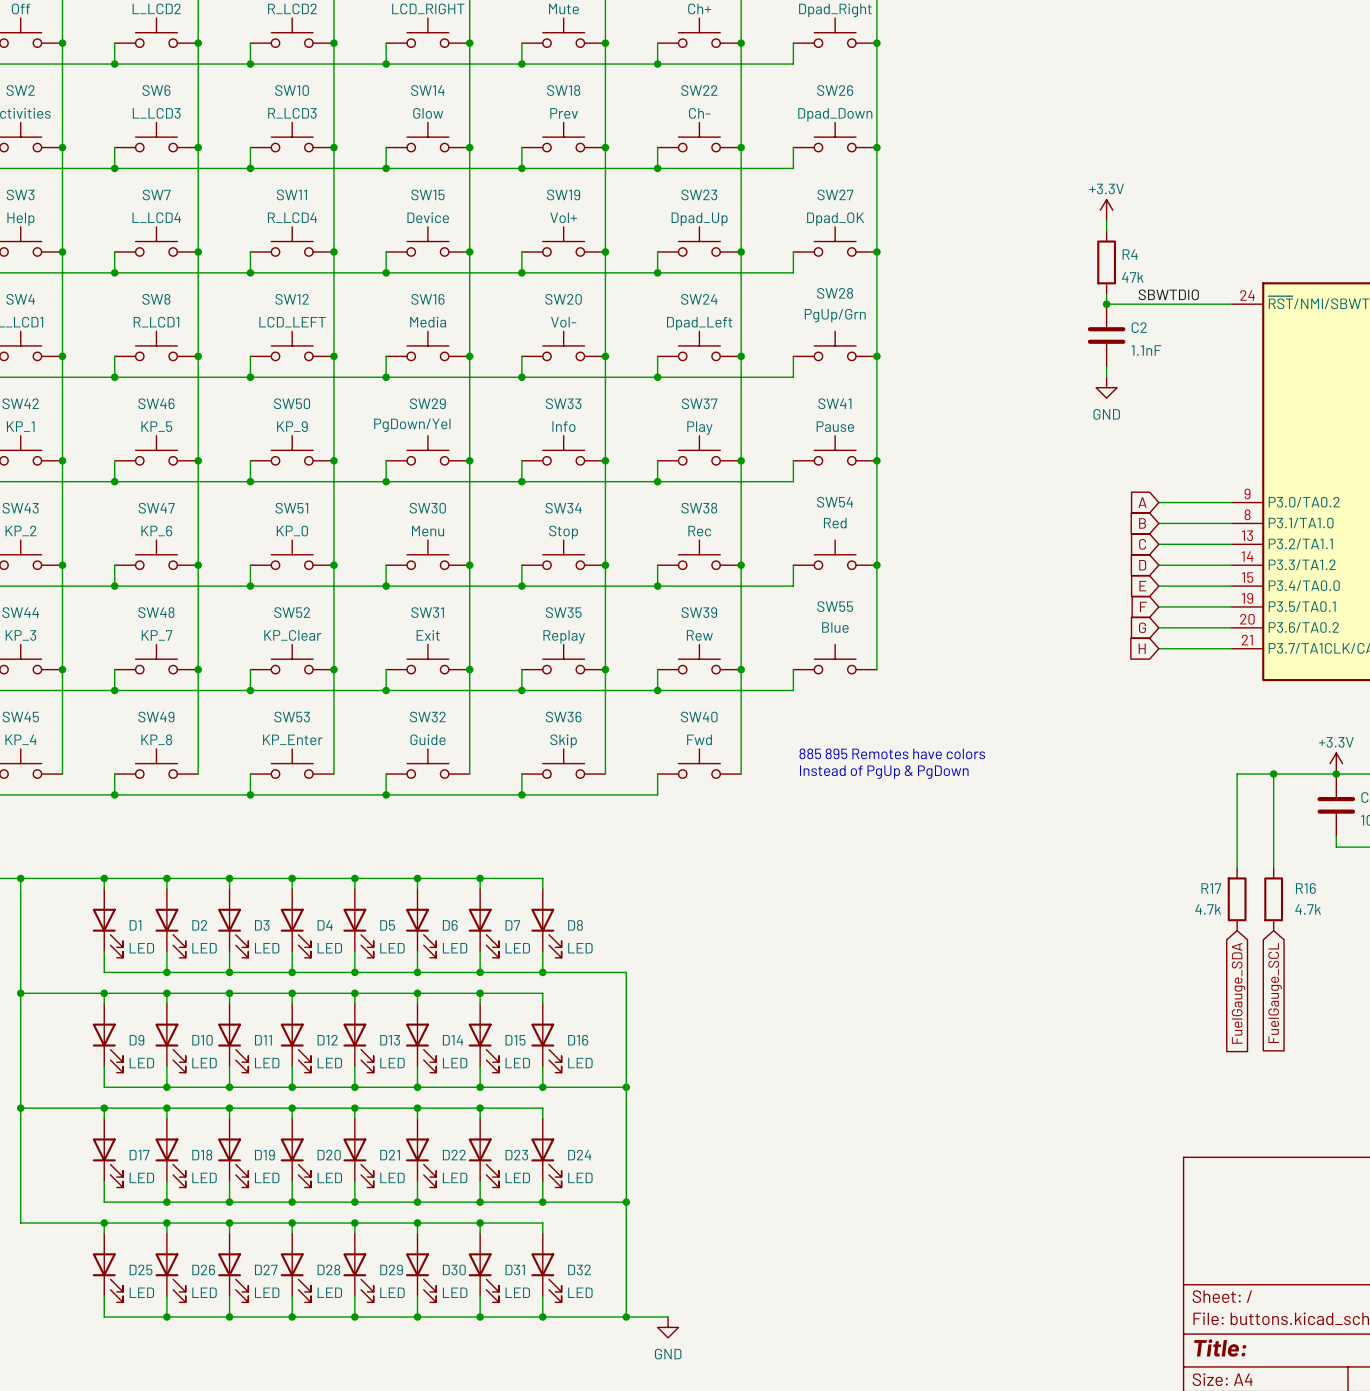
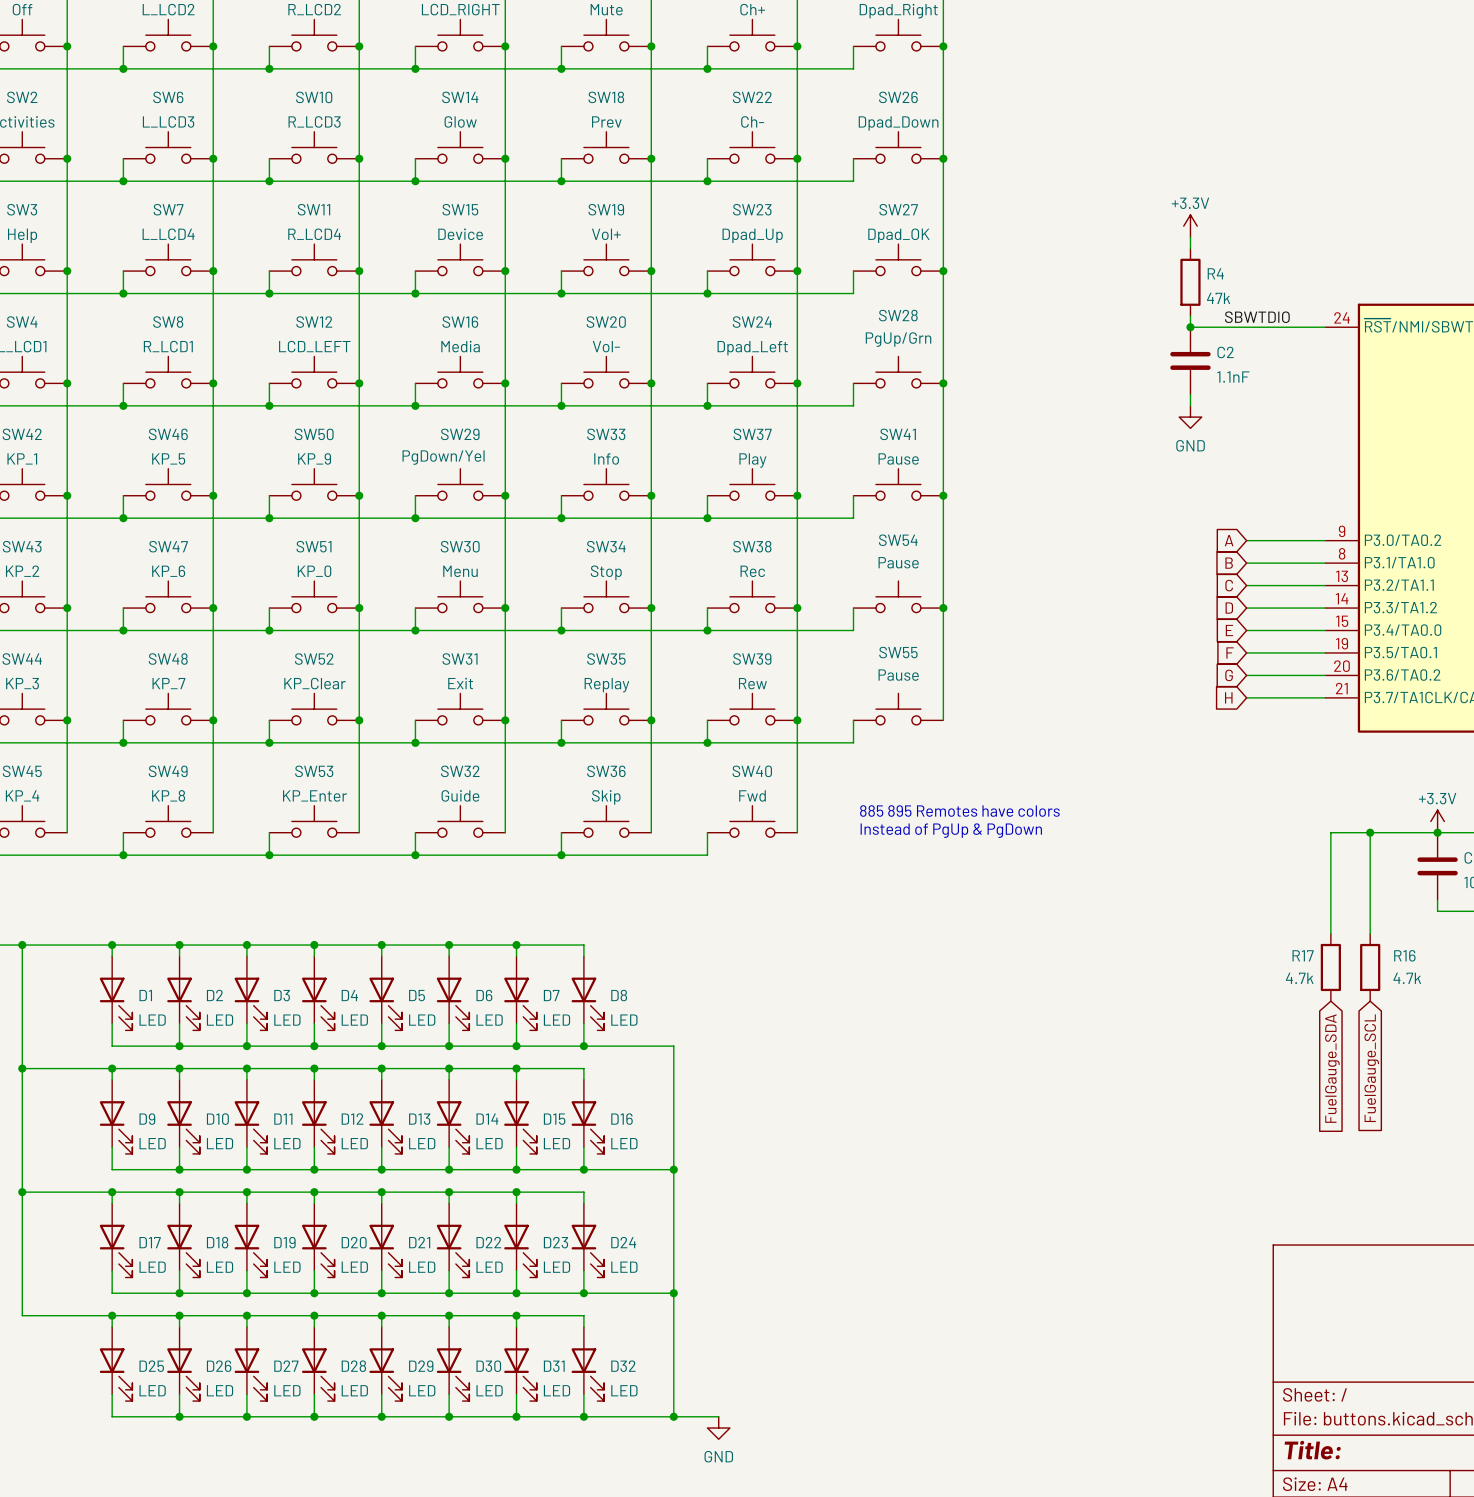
SW54 value: Red (835, 523) -> Pause (898, 562)
SW55 value: Blue (835, 627) -> Pause (898, 675)

